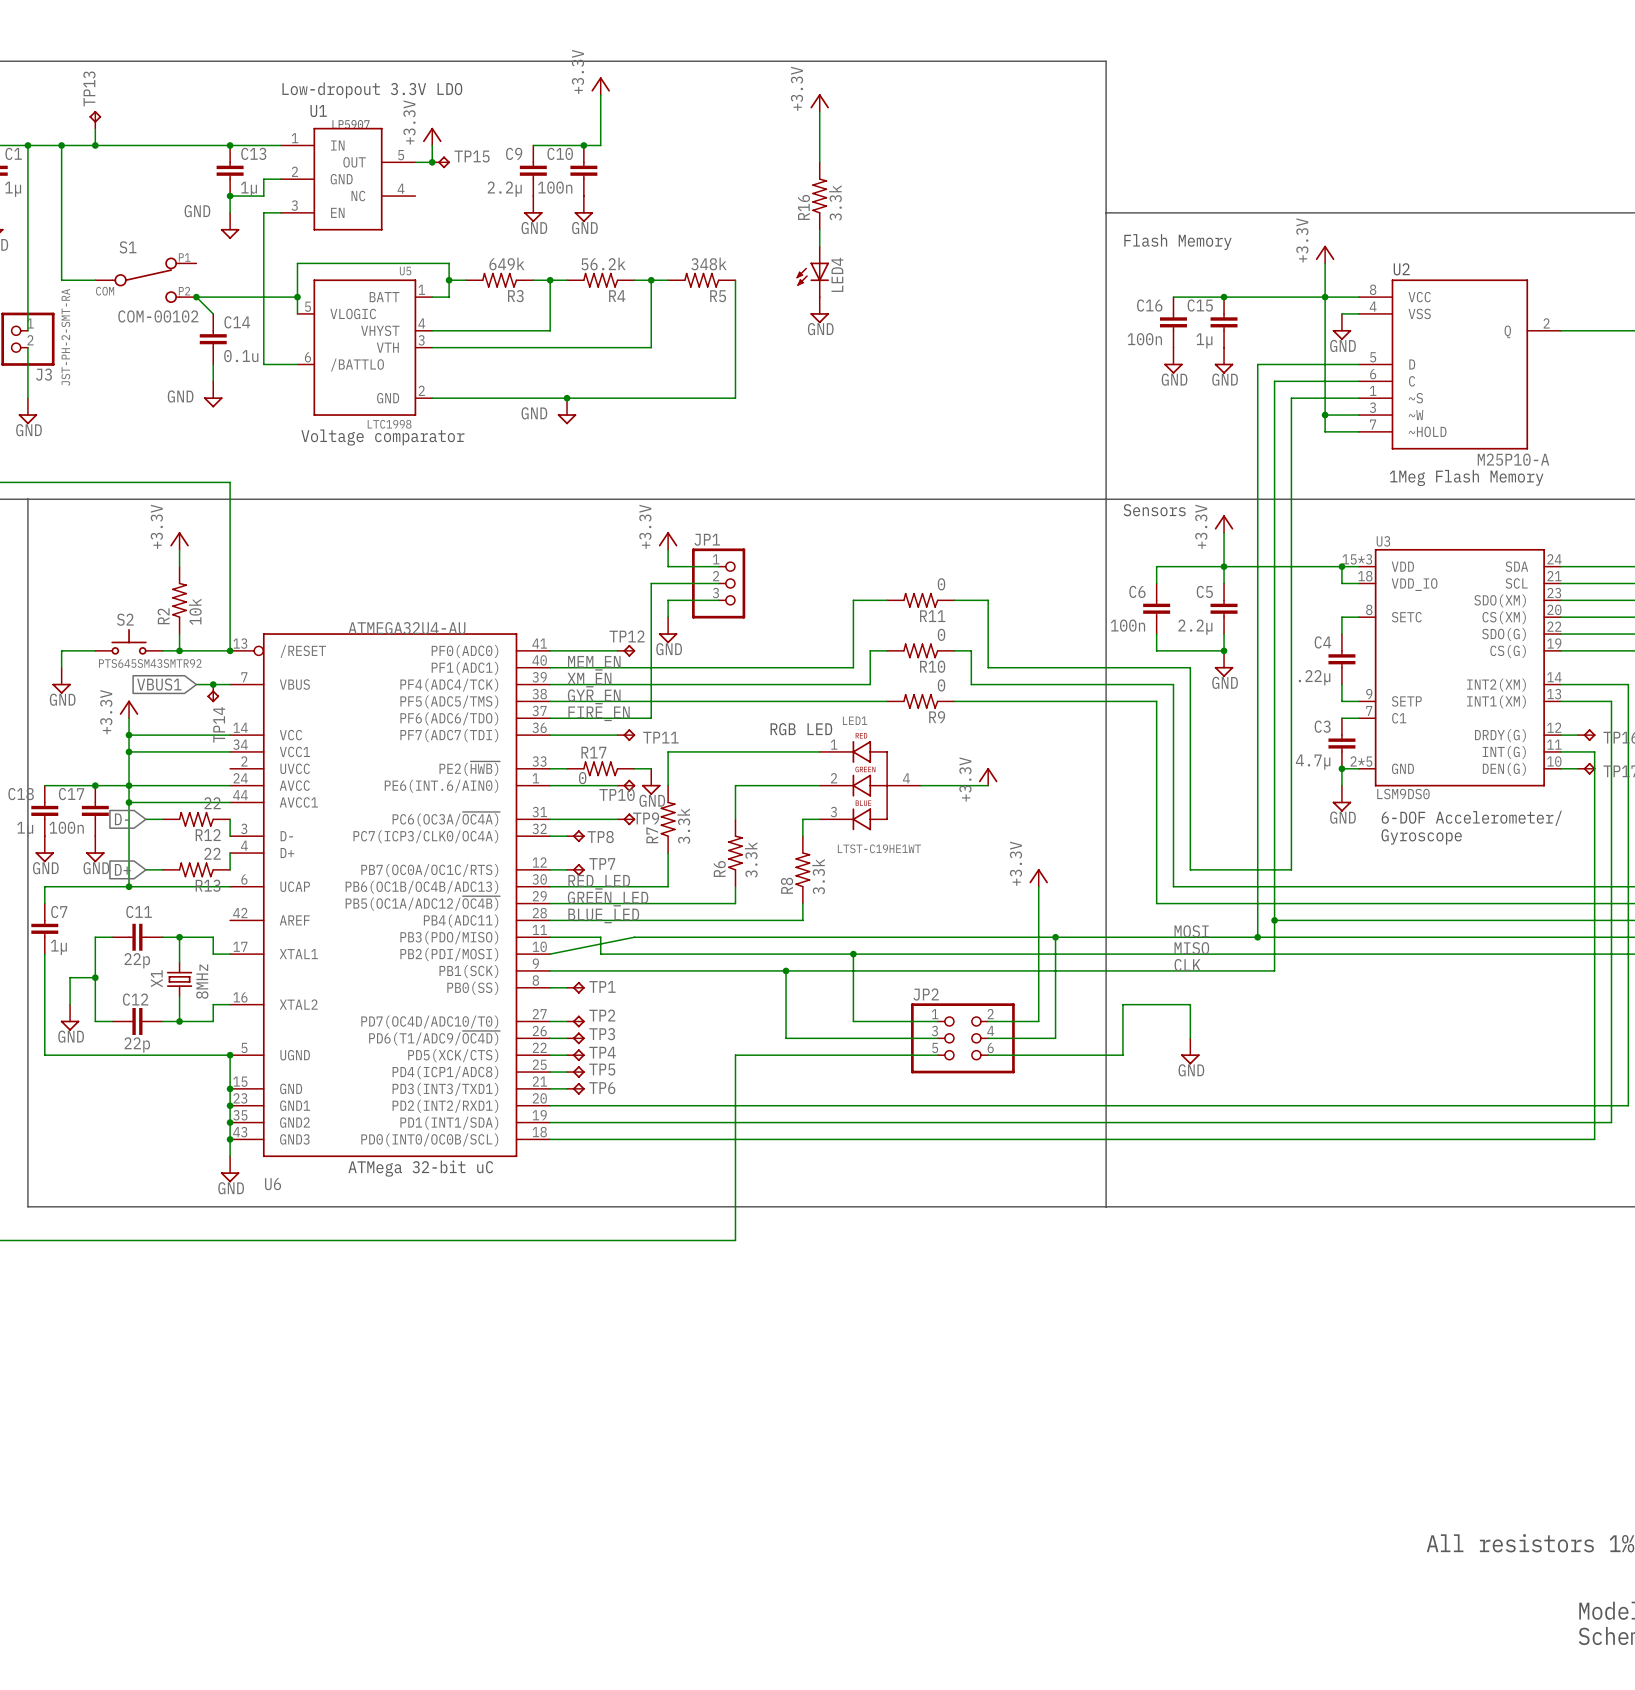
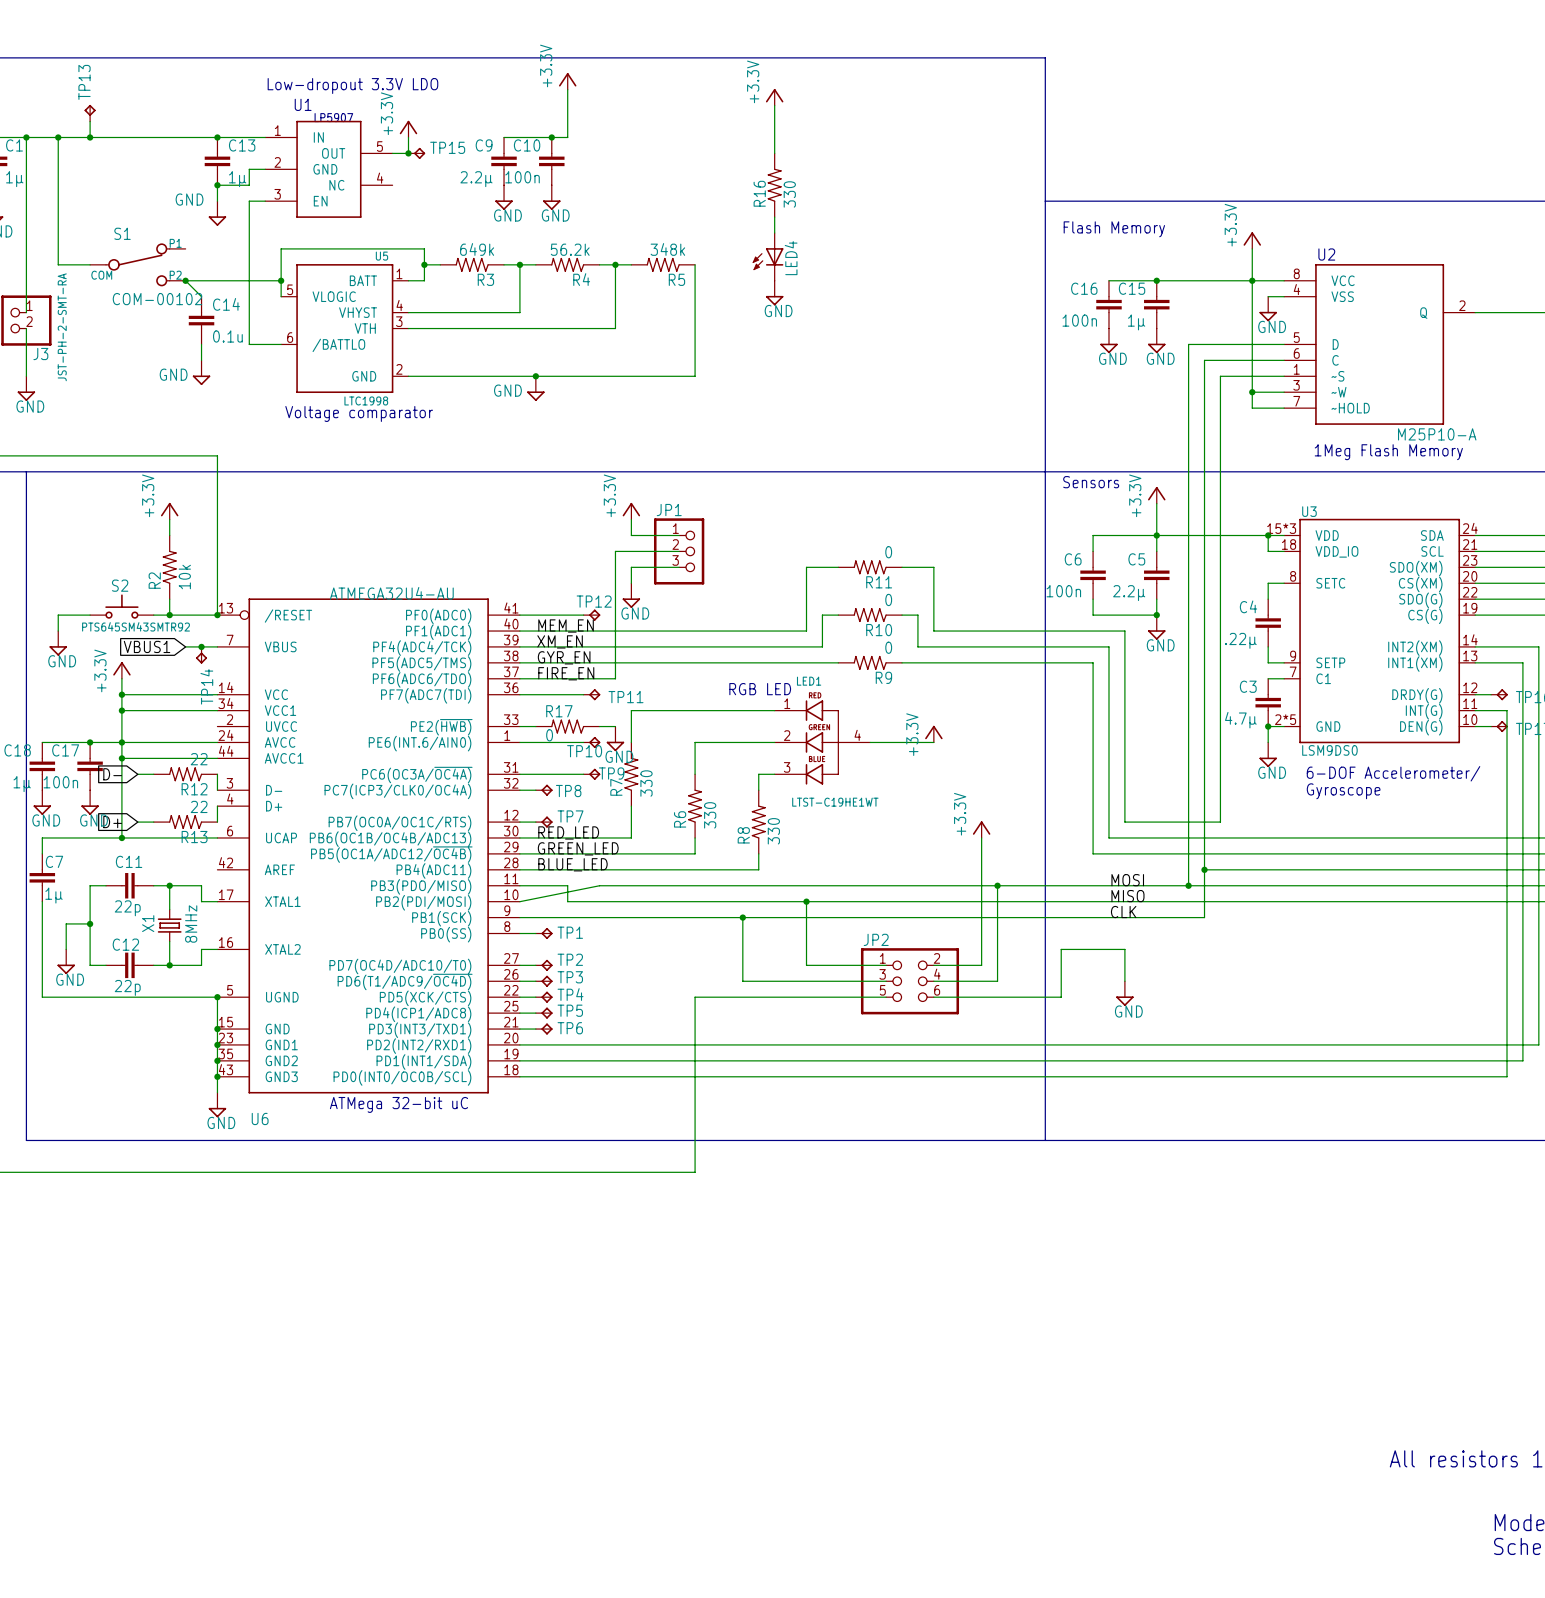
R16 value: 3.3k (835, 202) -> 330 (789, 194)
R7 value: 3.3k (683, 826) -> 330 (646, 783)
R6 value: 3.3k (751, 859) -> 330 (710, 815)
R8 value: 3.3k (818, 876) -> 330 (773, 831)

